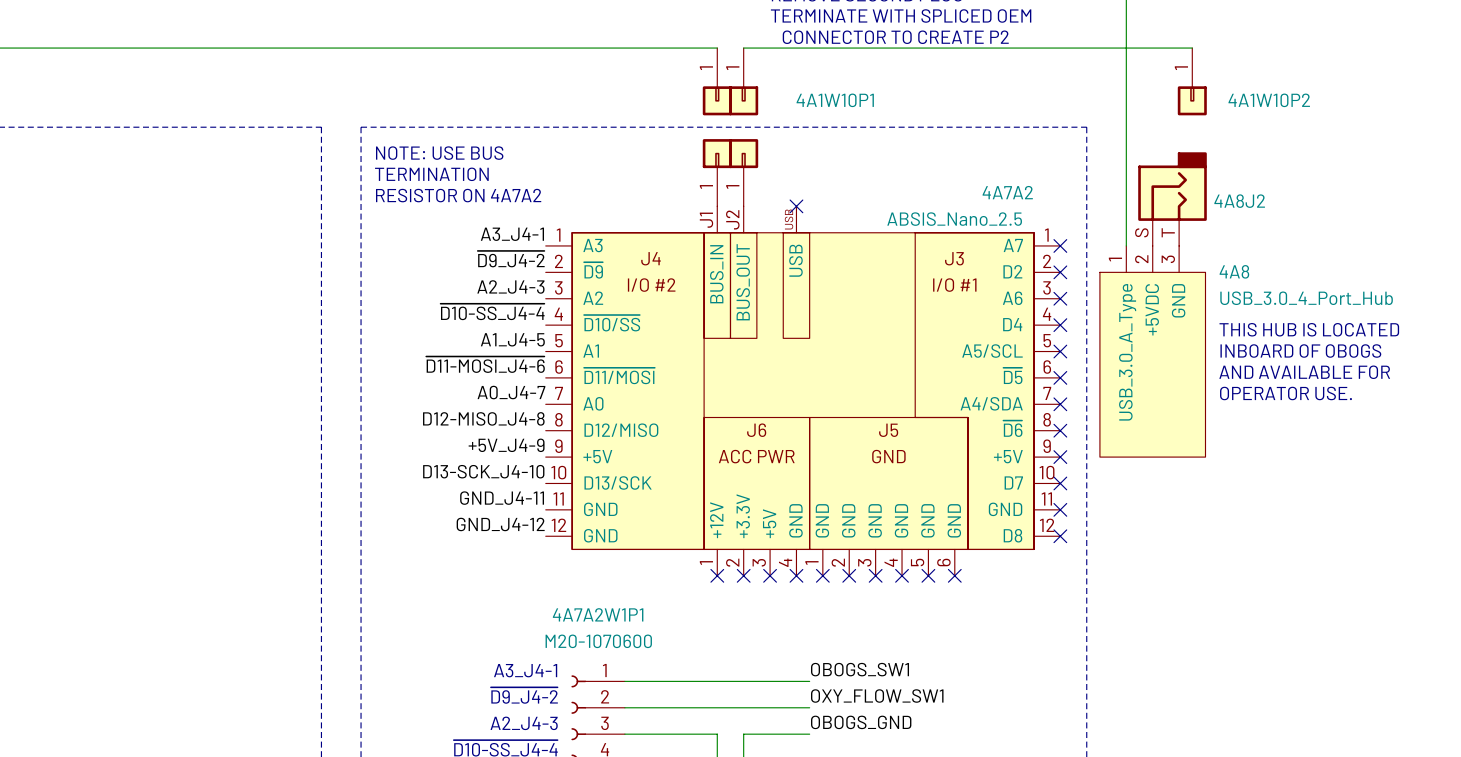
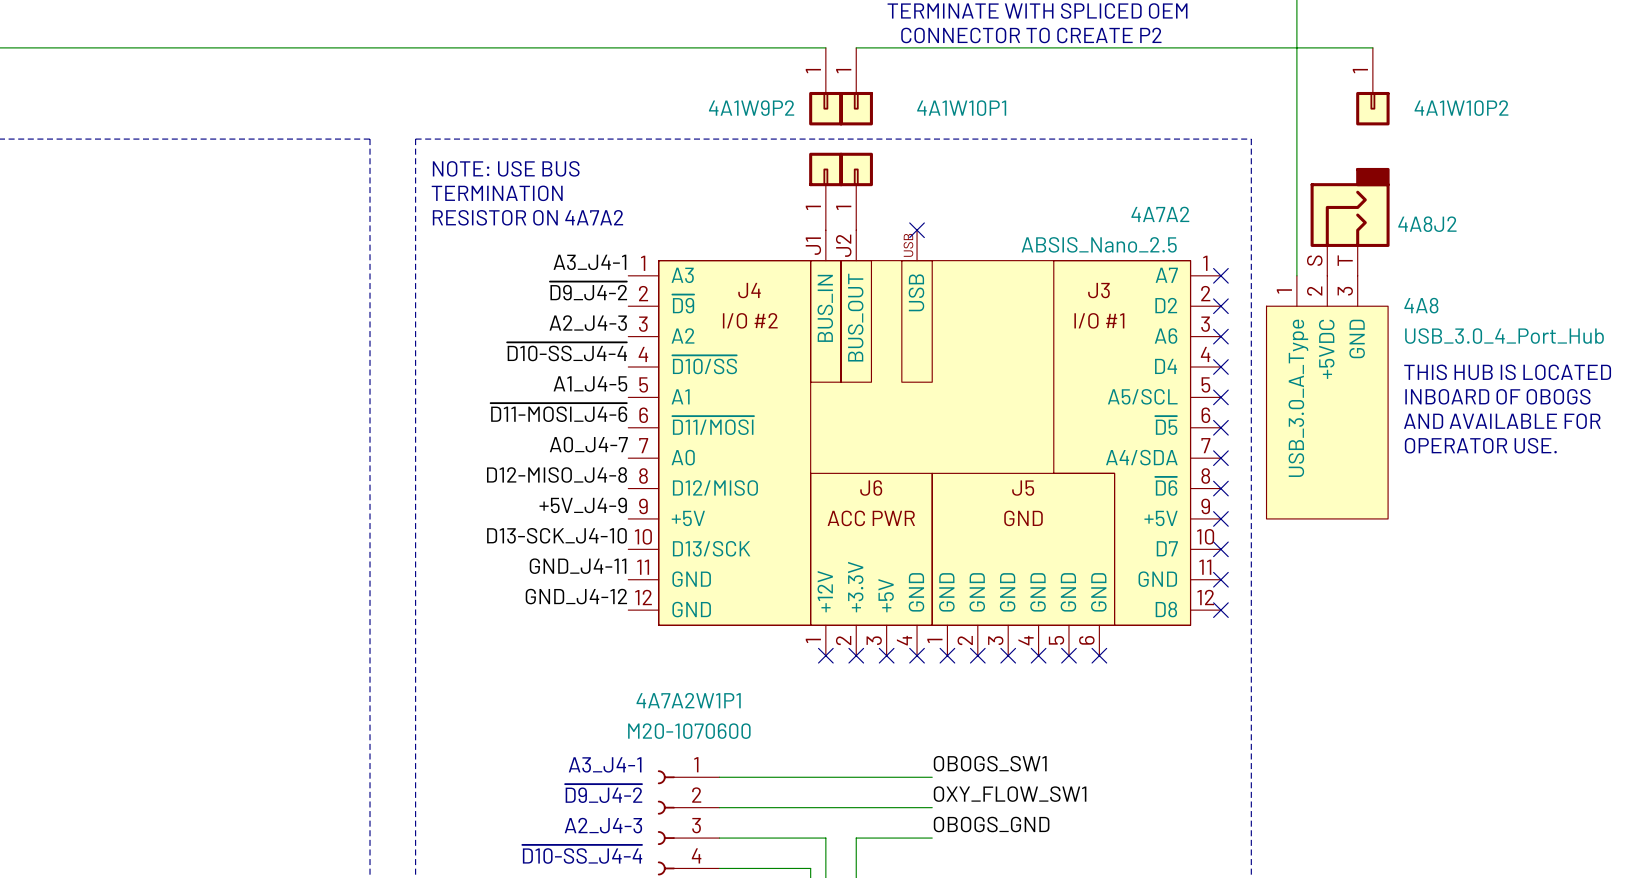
4A1W9P2 name: none -> 4A1W9P2 (751, 108)

